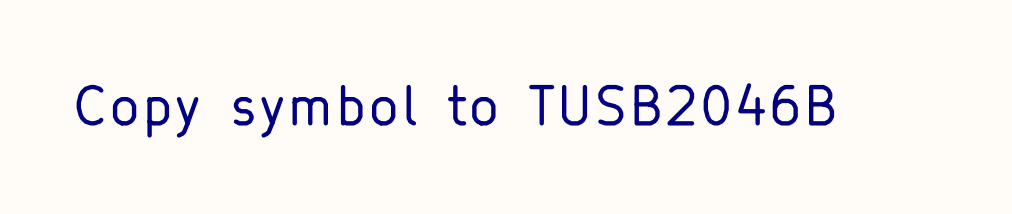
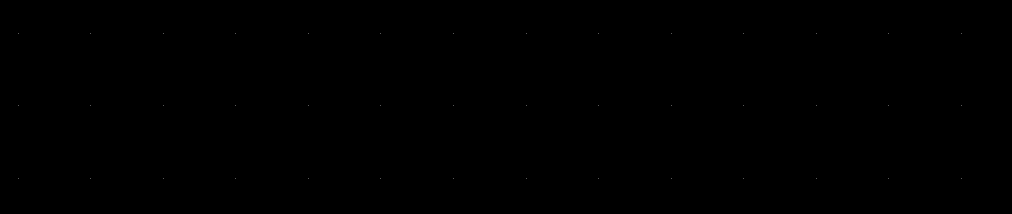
text: Copy symbol to TUSB2046B (455, 110) -> none

